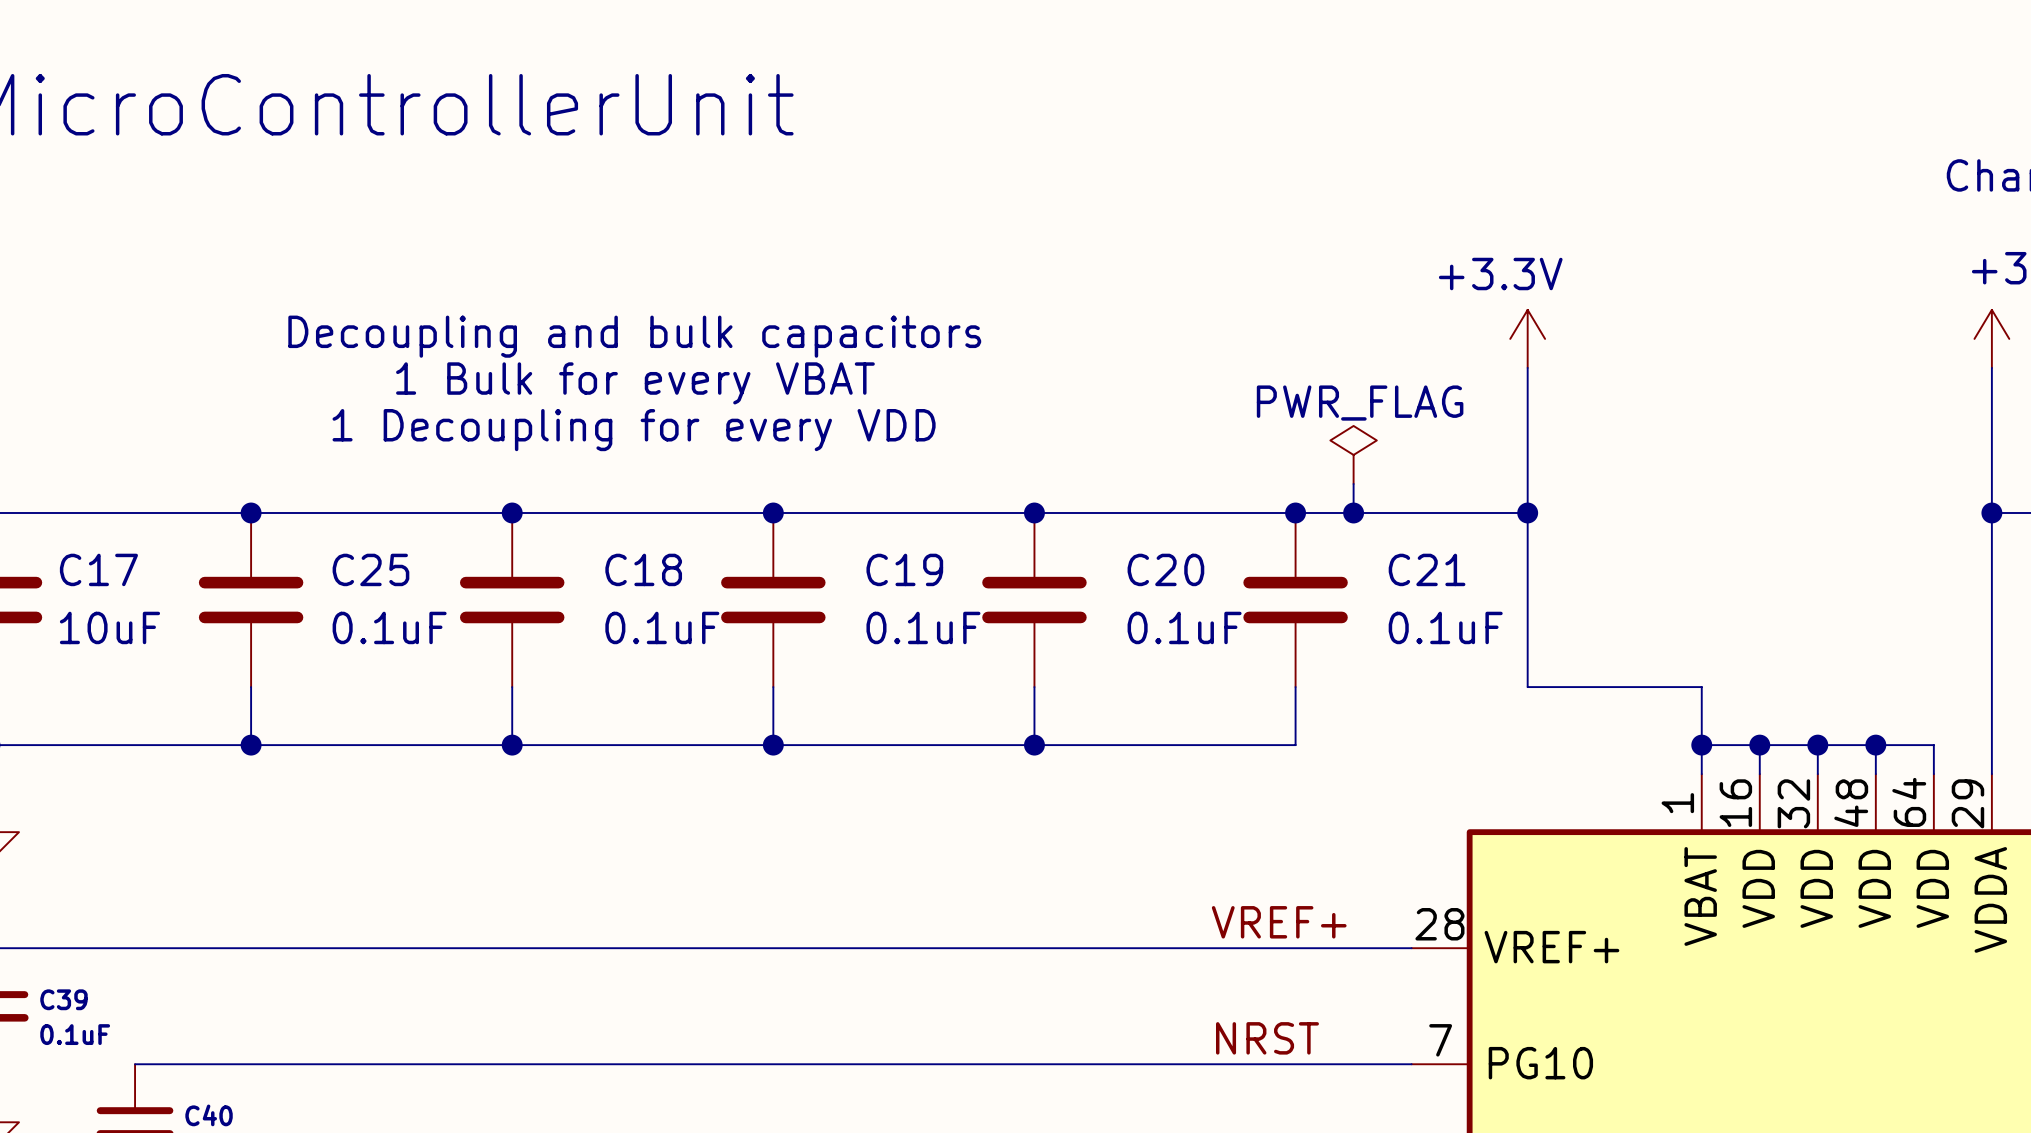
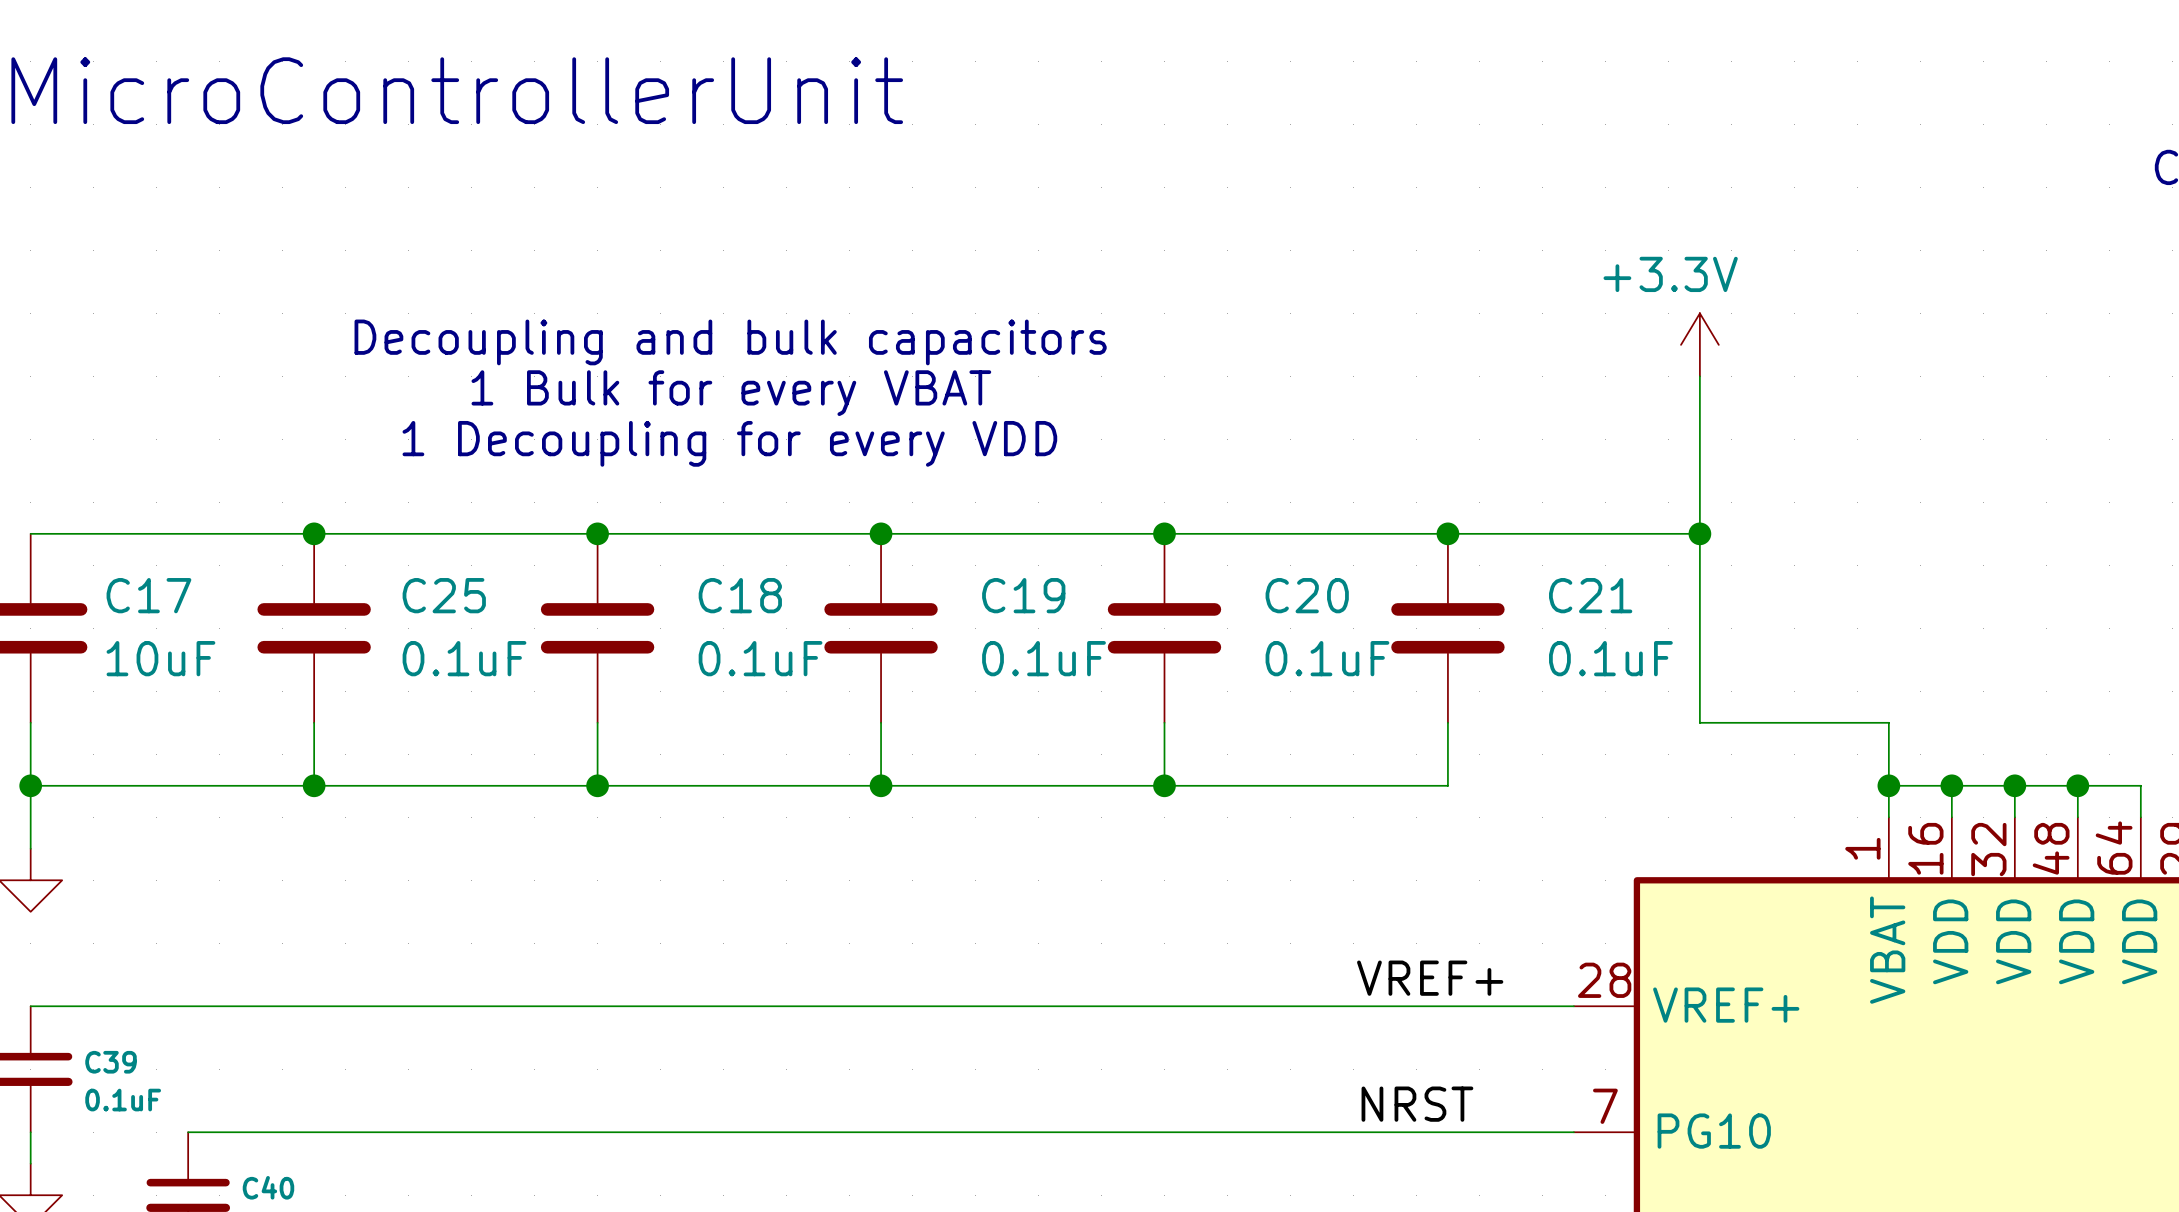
power symbol: PWR_FLAG (1353, 454) -> none
wire: (1353, 483) (1353, 512) -> none
junction: (1353, 512) -> none

